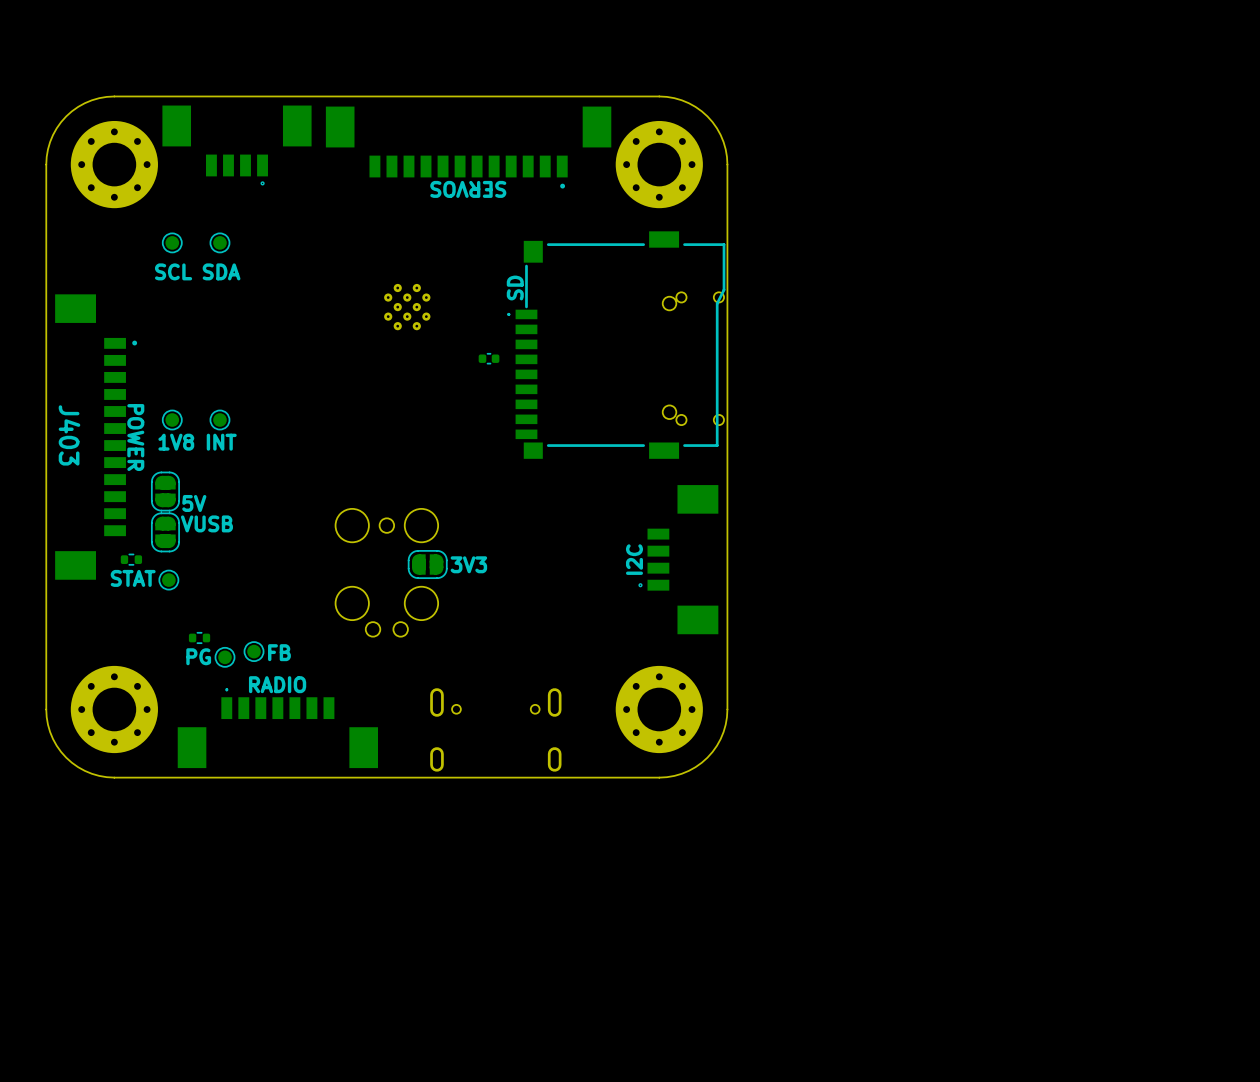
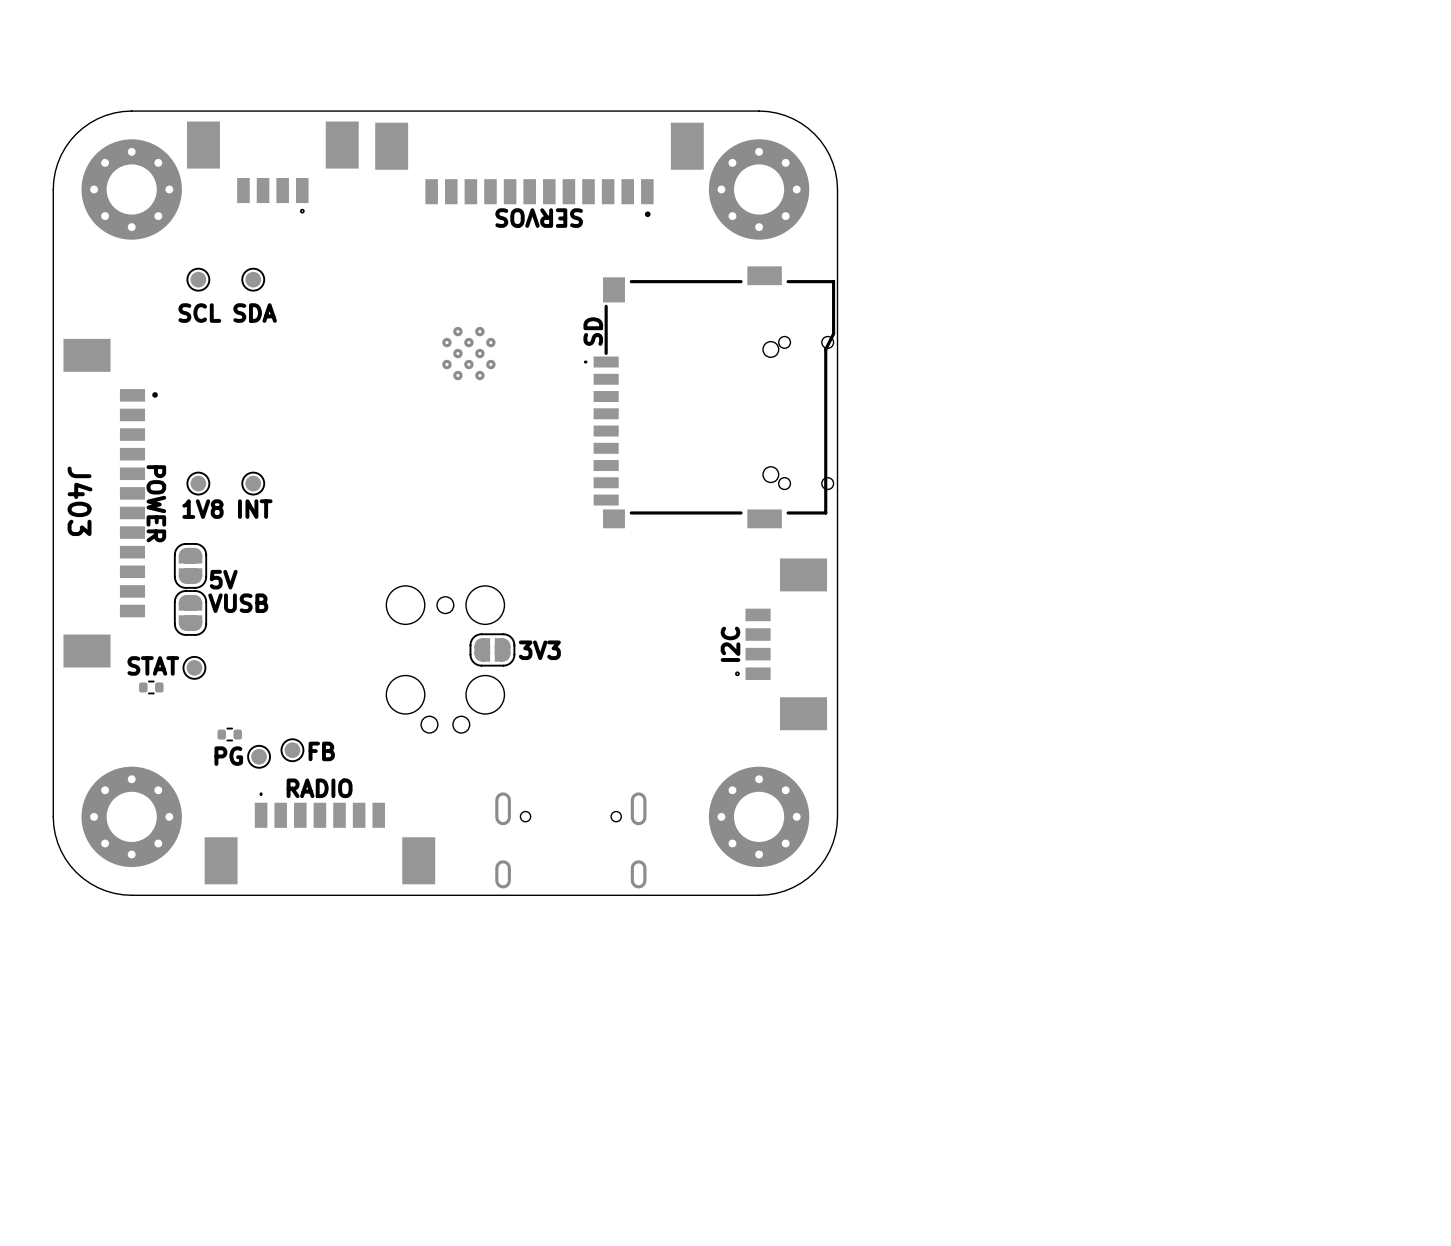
part: (489, 358) -> none
part position: (131, 559) -> (151, 687)

